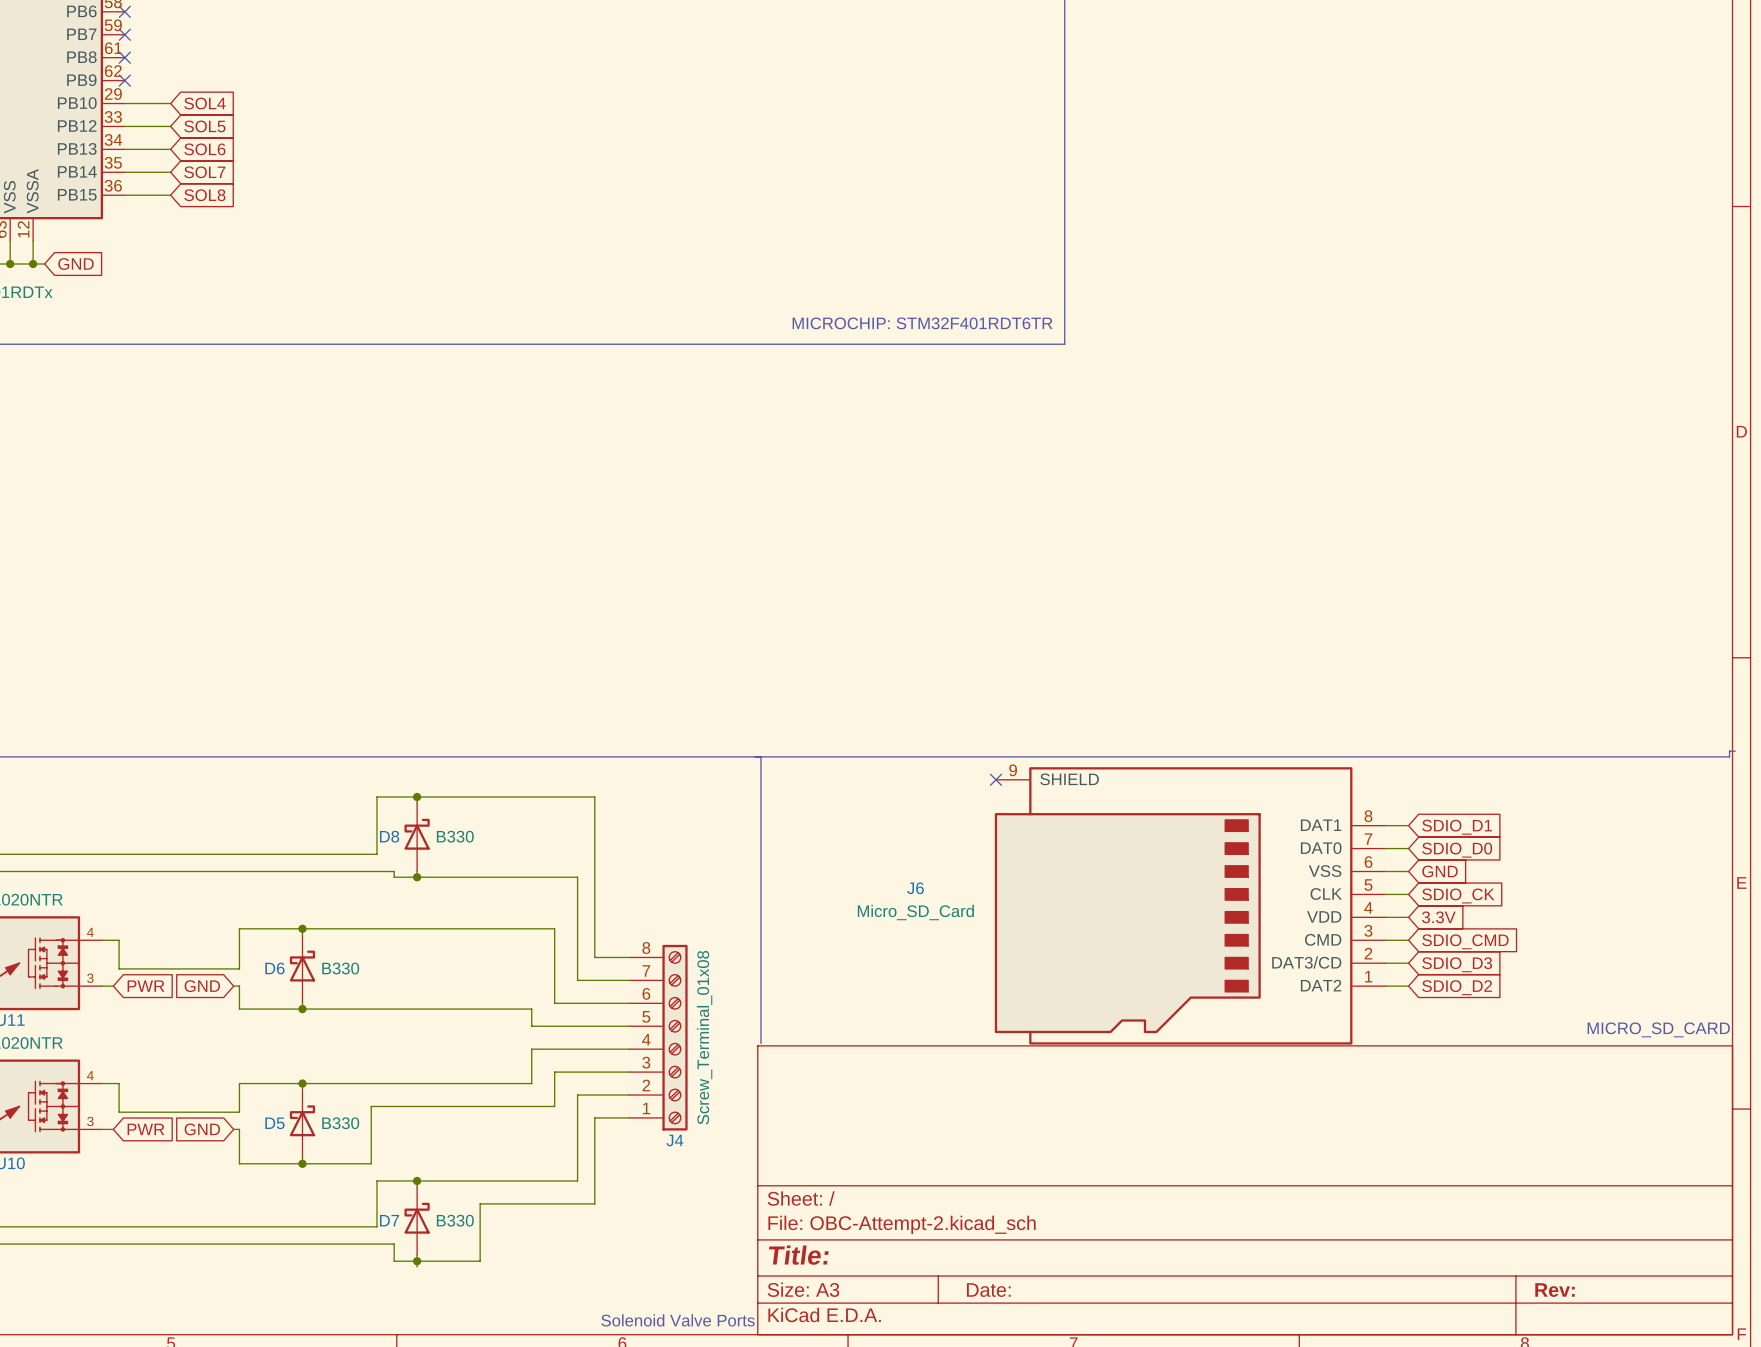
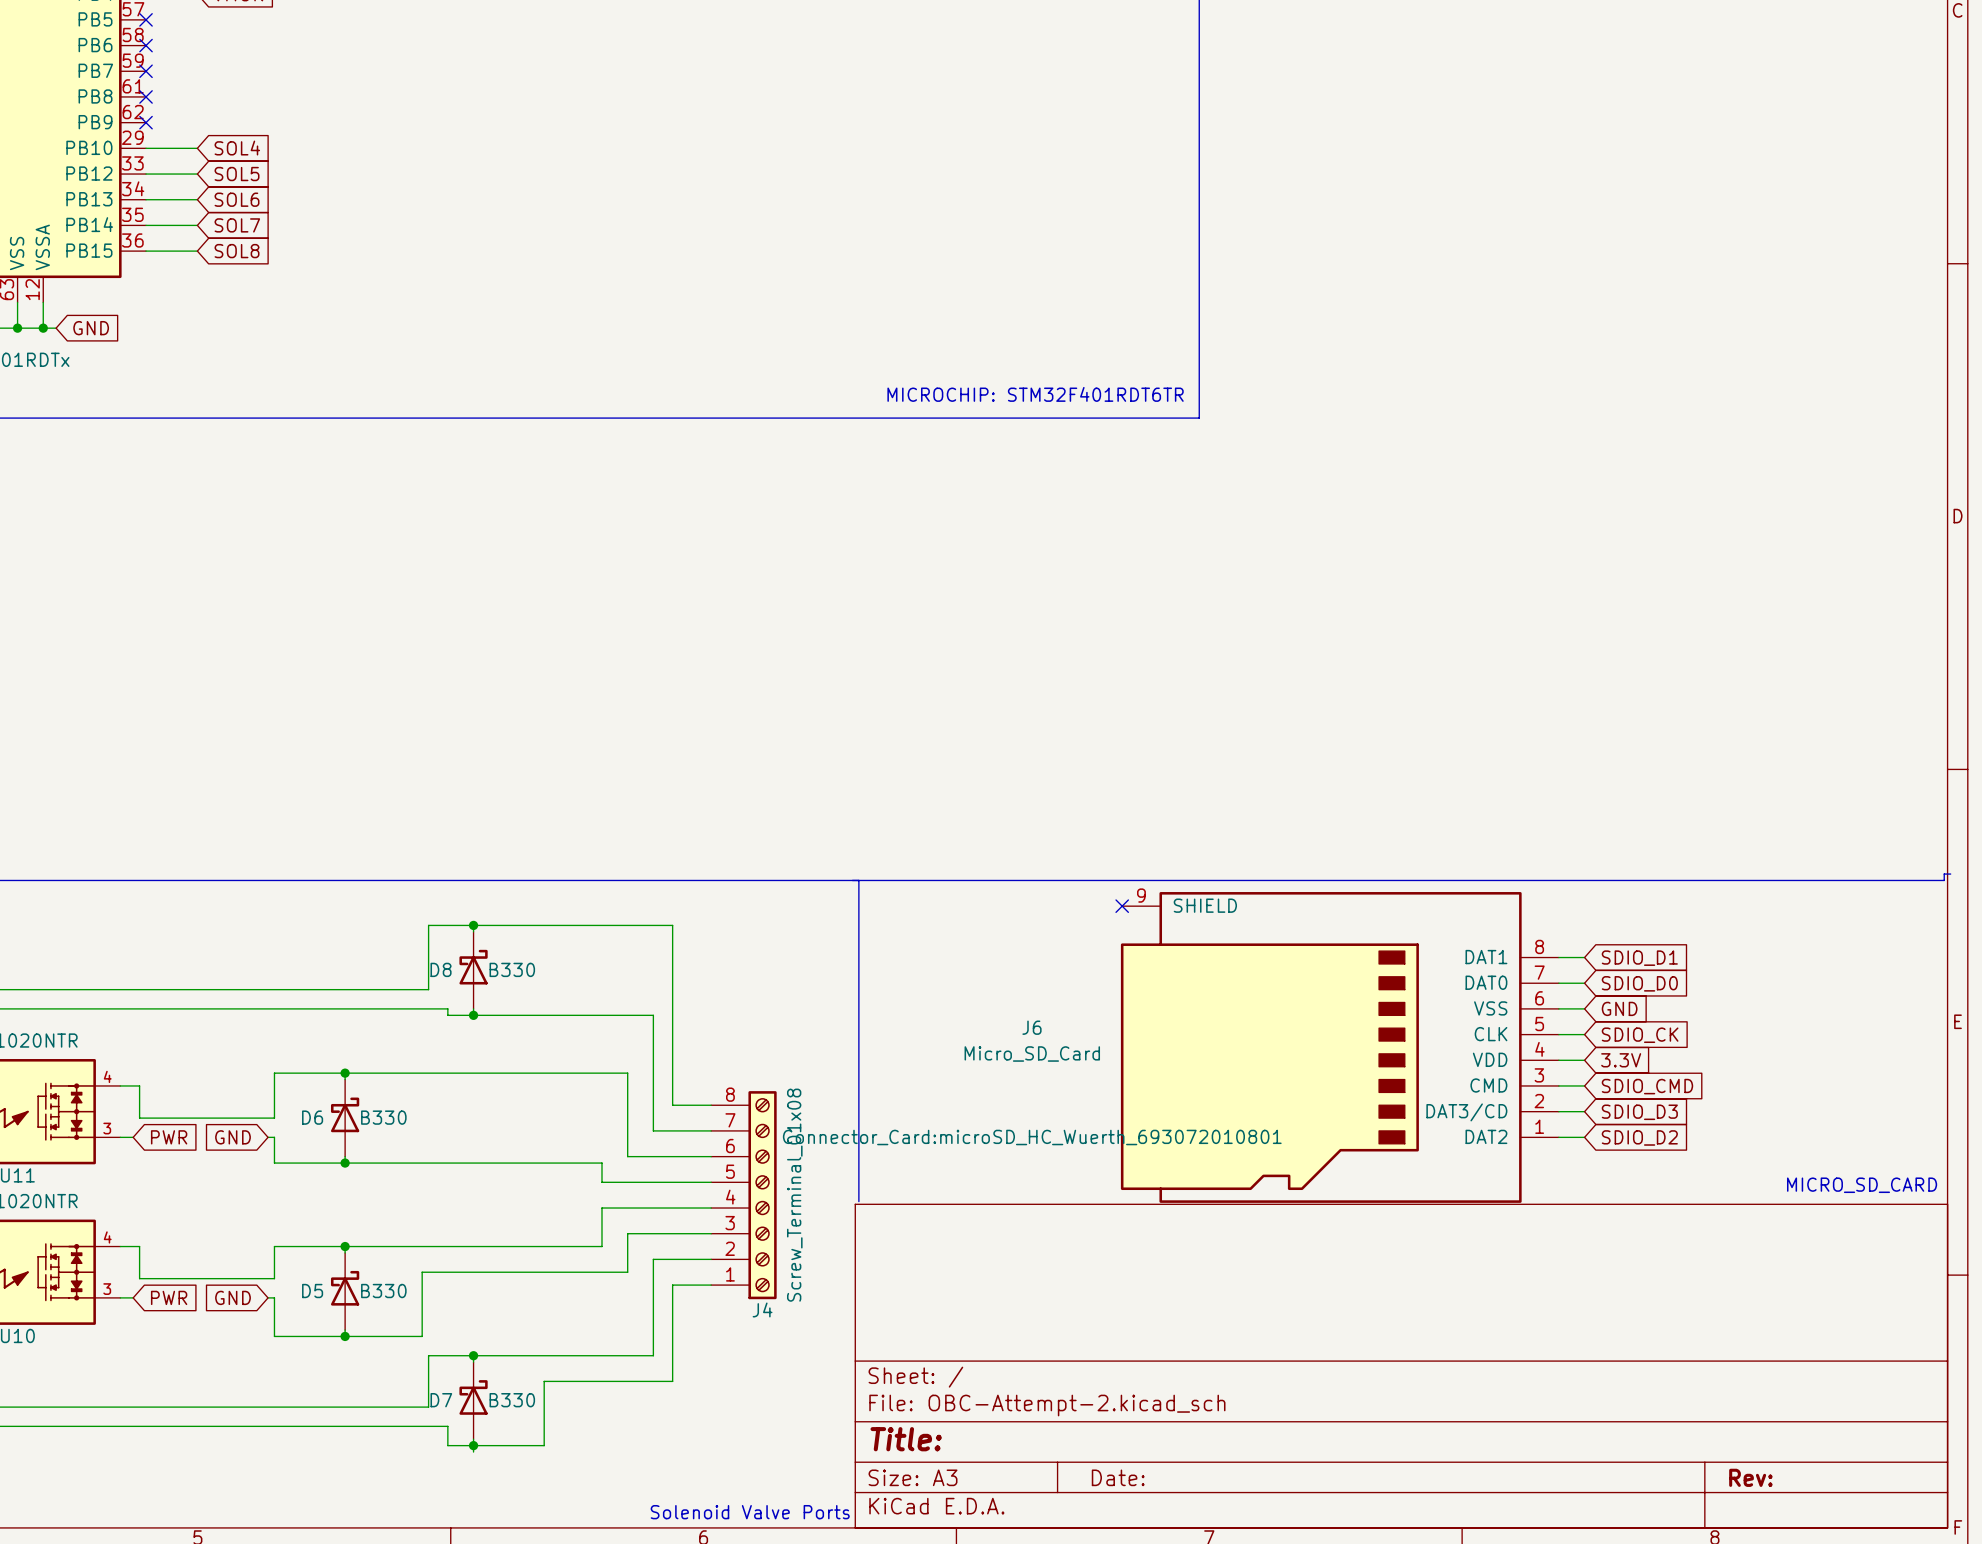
J6 text: none -> Connector_Card:microSD_HC_Wuerth_693072010801 (1032, 1137)

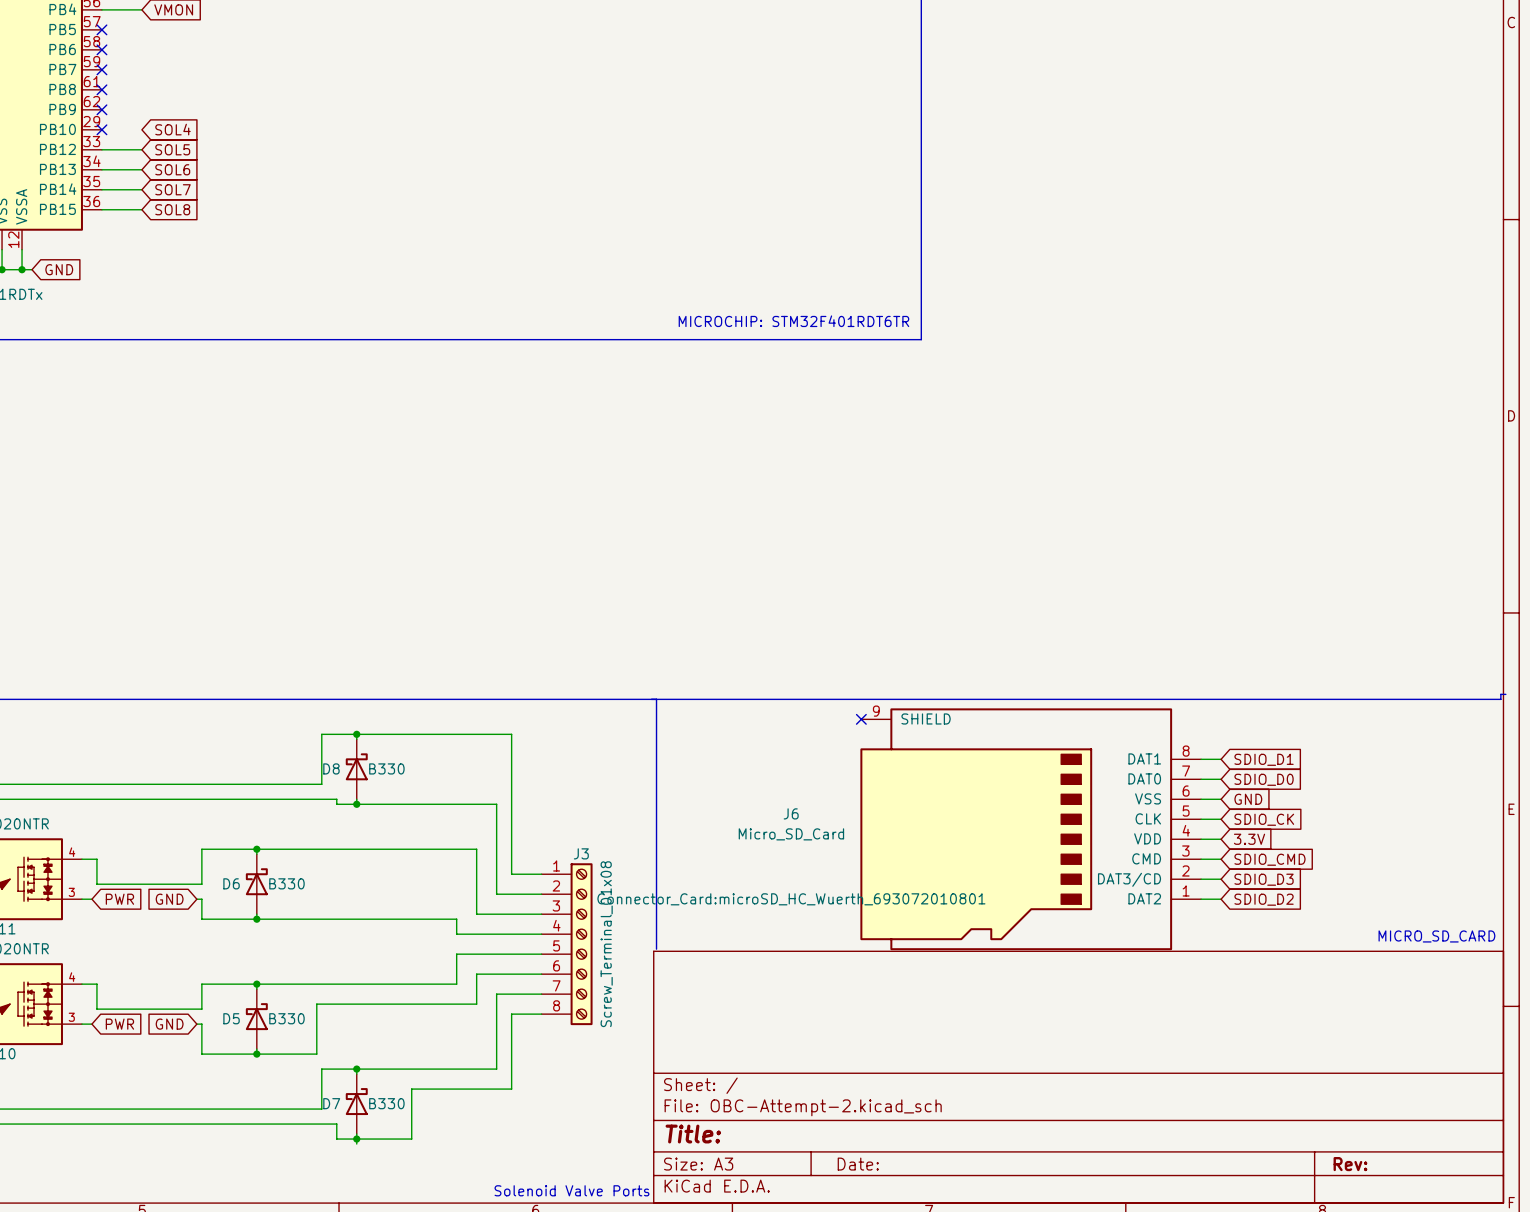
wire: (146, 148) (197, 148) -> none
no-connect mark: none -> (101, 129)
J4: Screw_Terminal_01x08 (743, 1195) -> none
J3: none -> Screw_Terminal_01x08 (567, 944)

